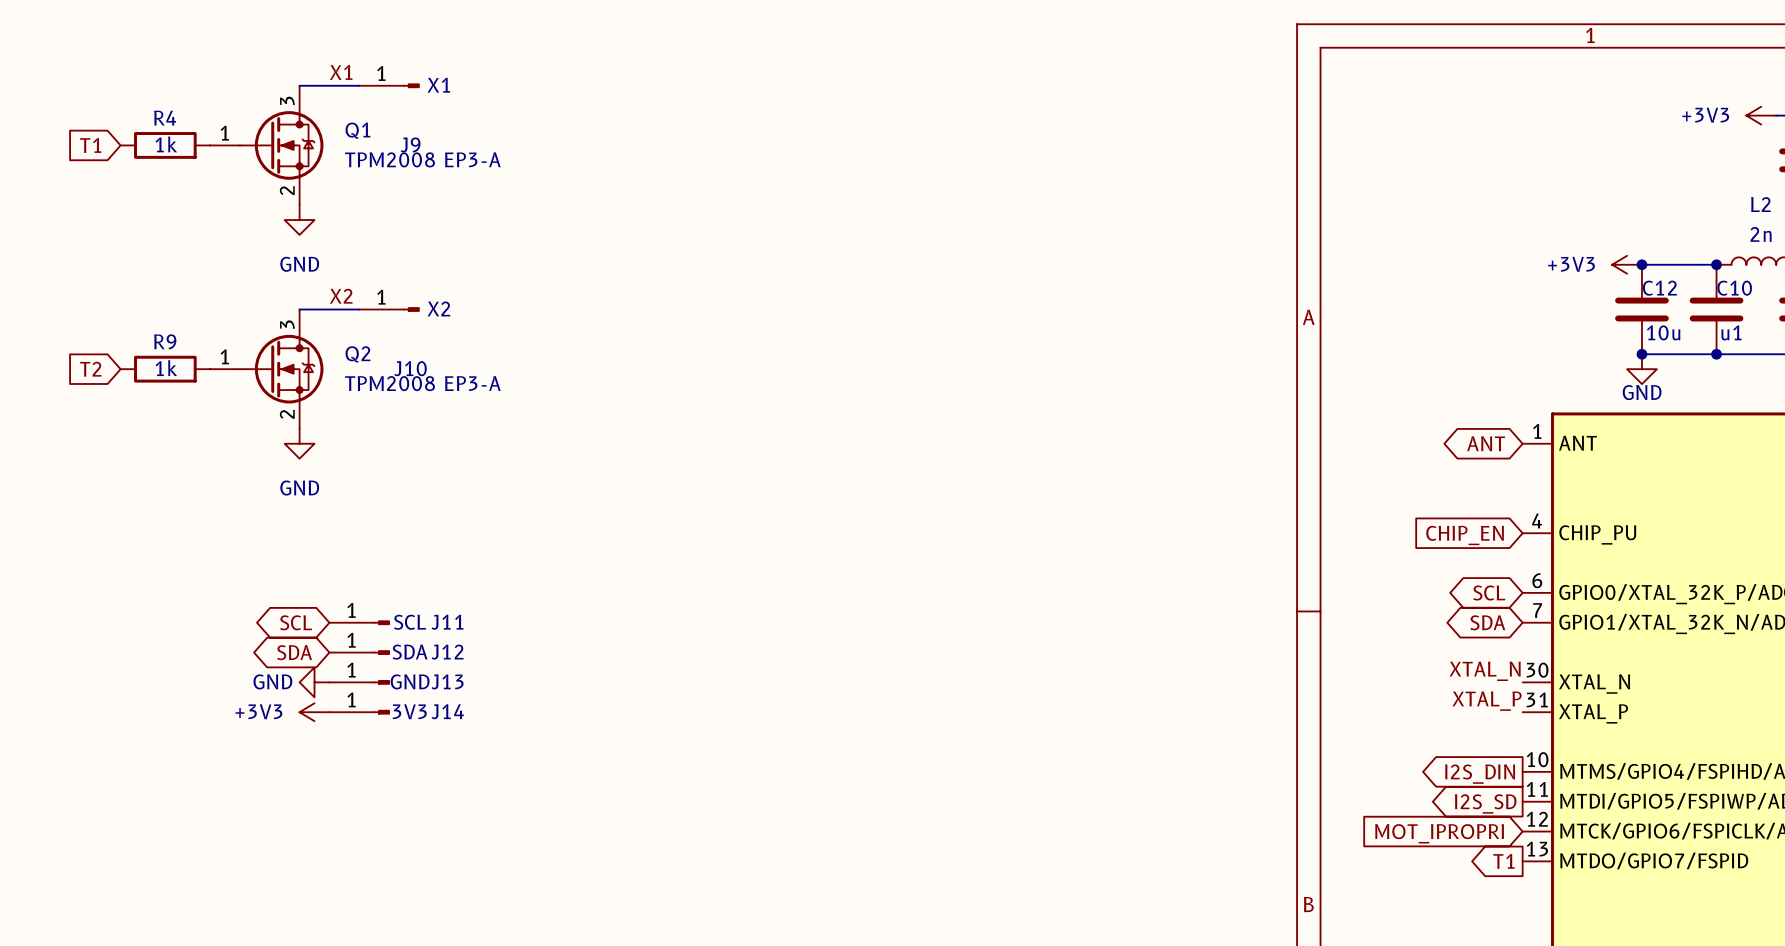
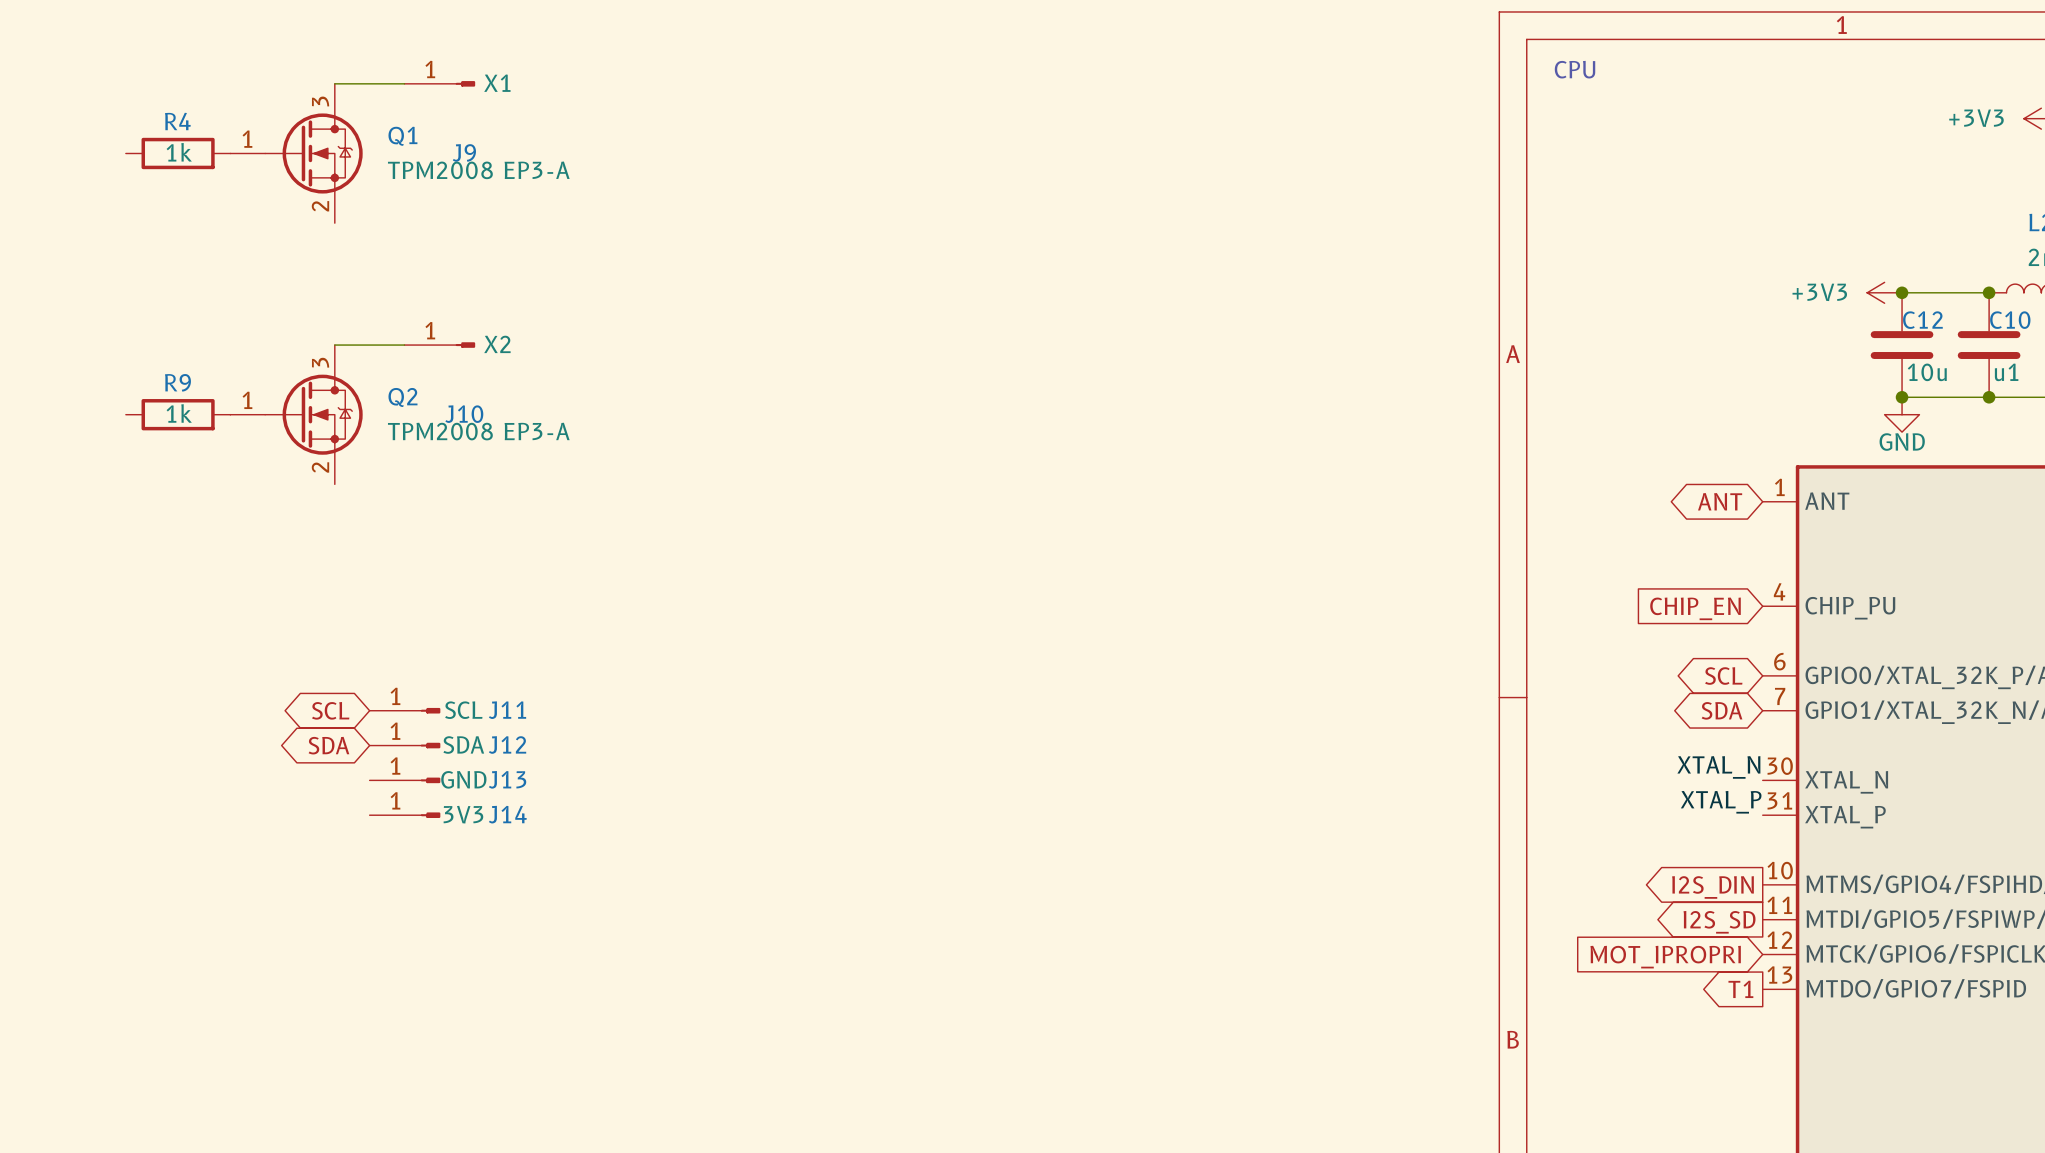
label: X1 (341, 72) -> none
text: none -> CPU (1575, 69)
global label: T1 (90, 145) -> none
power symbol: GND (299, 220) -> none
label: X2 (341, 296) -> none
global label: T2 (90, 369) -> none
power symbol: GND (299, 443) -> none
power symbol: GND (314, 682) -> none
power symbol: +3V3 (314, 712) -> none

